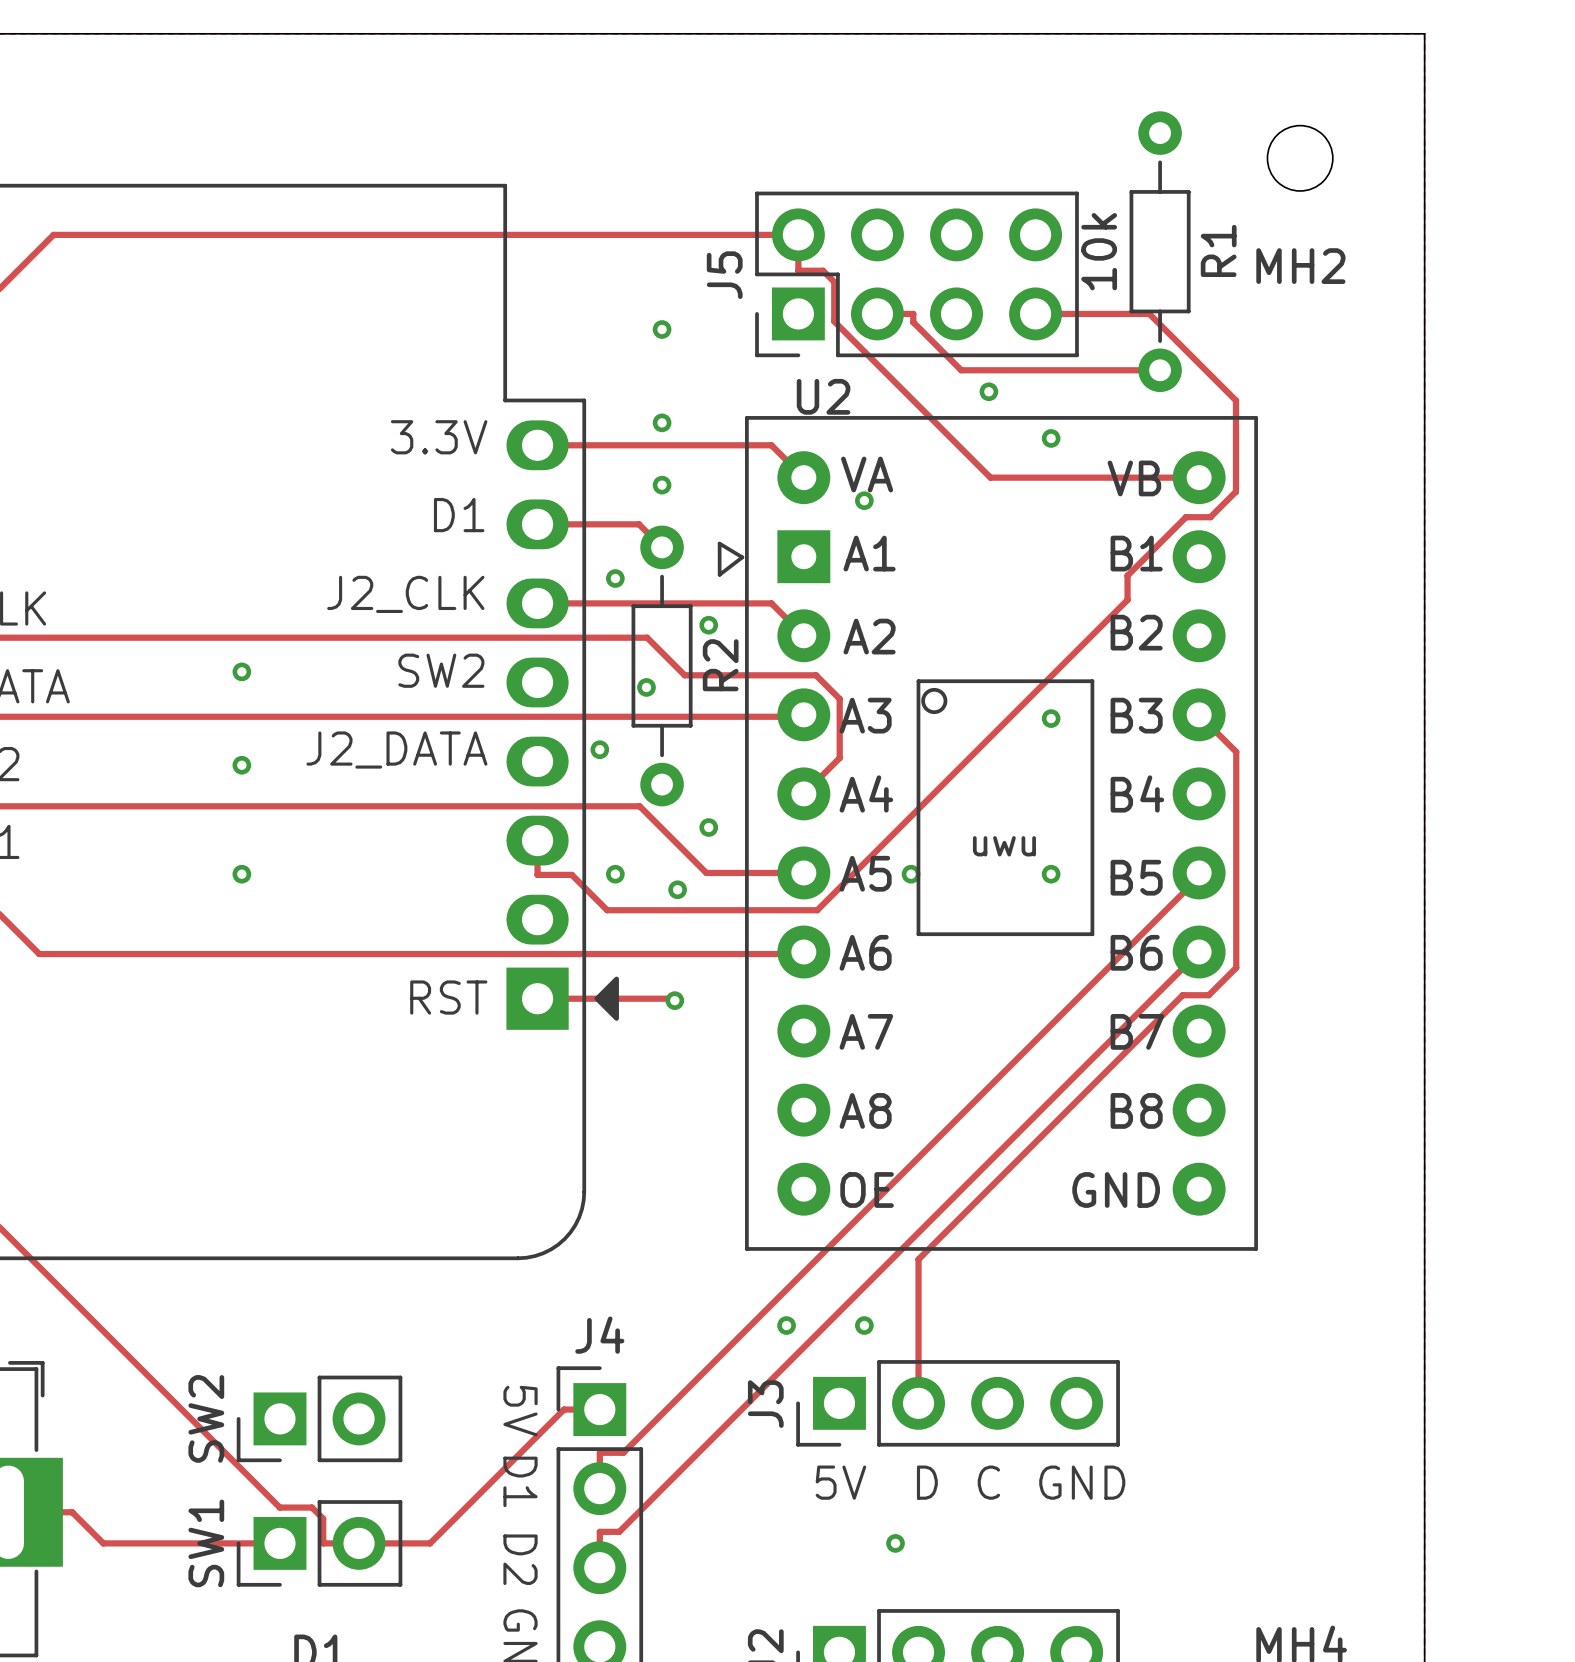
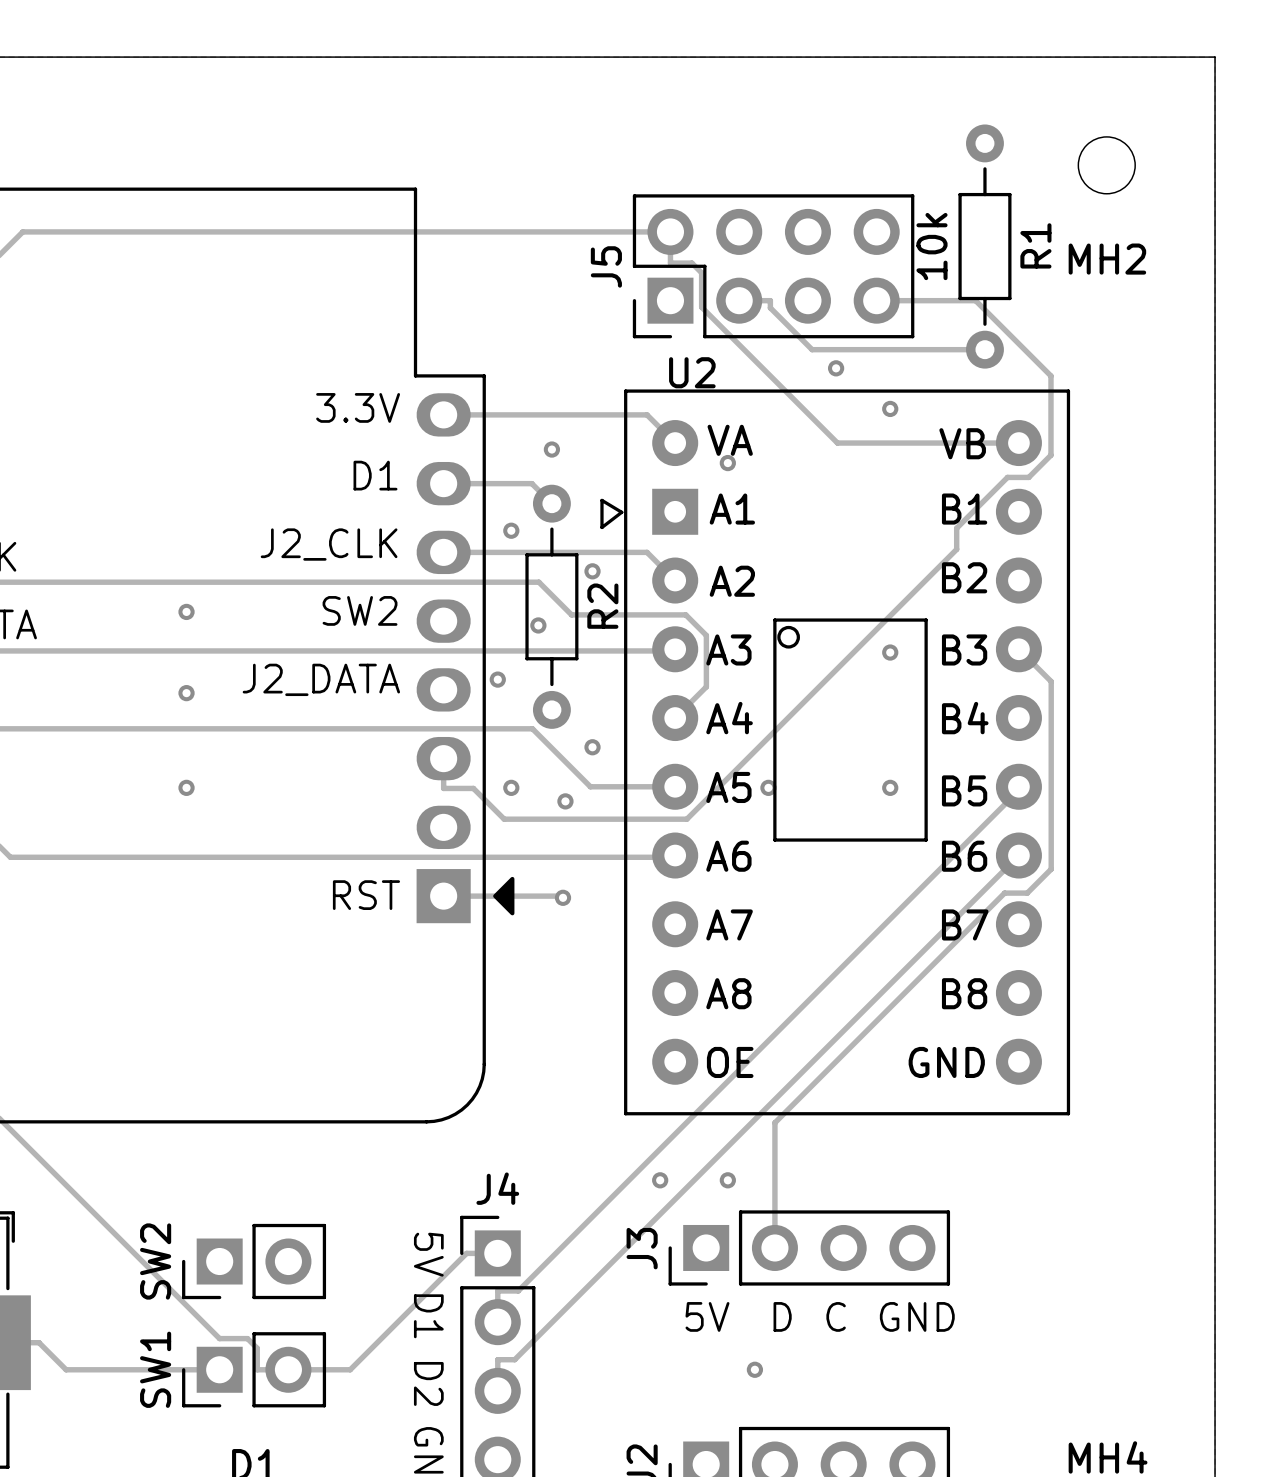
via: (662, 329) -> none
via: (662, 422) -> none
text: uwu (1004, 846) -> none

